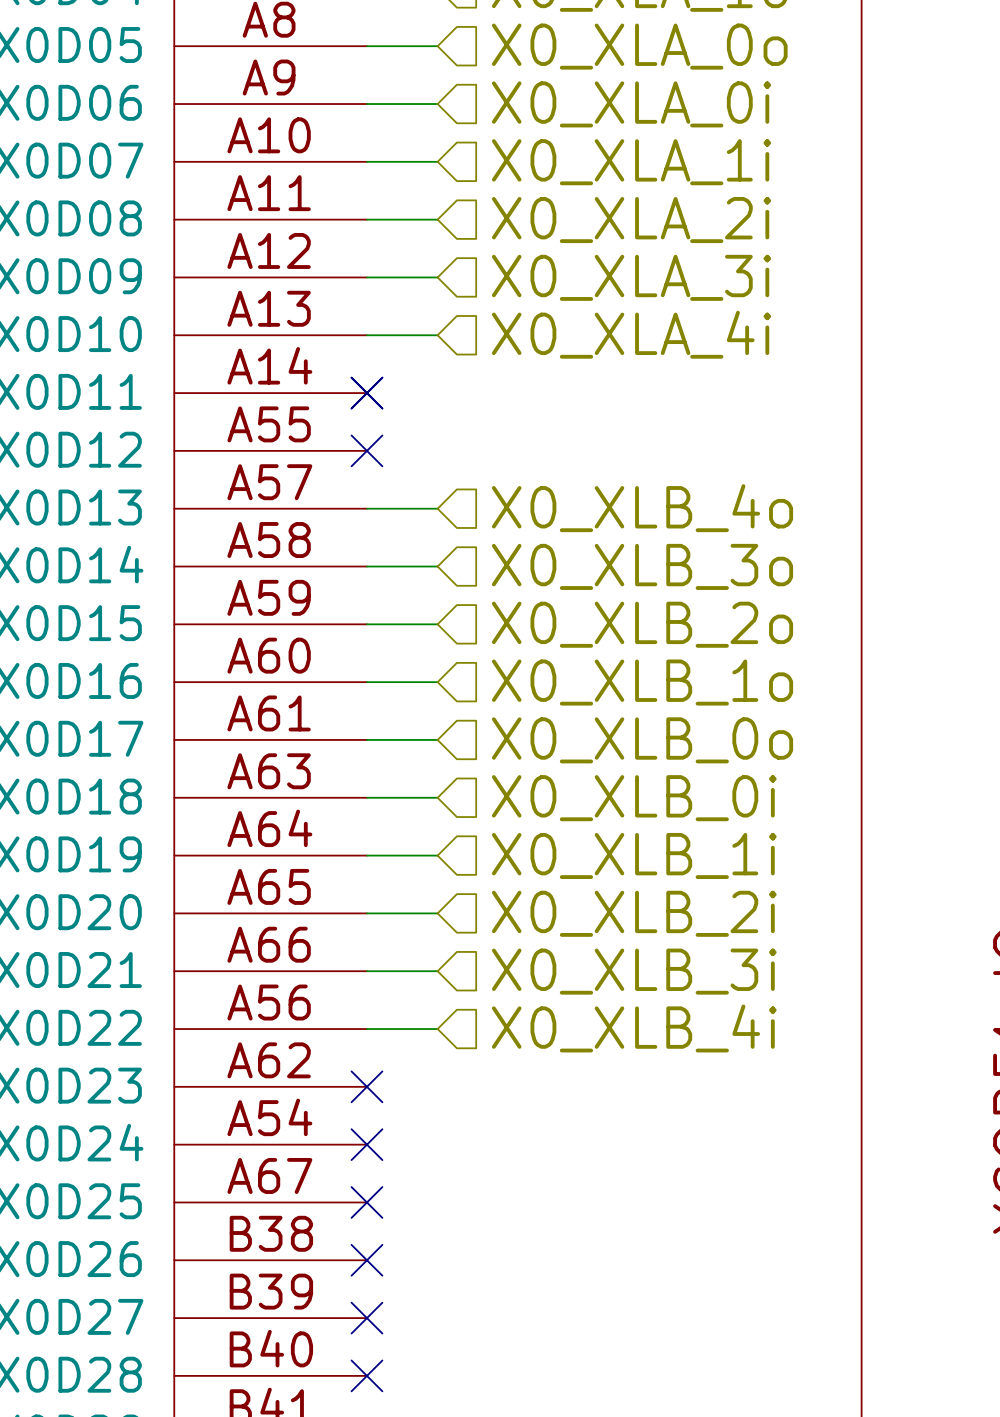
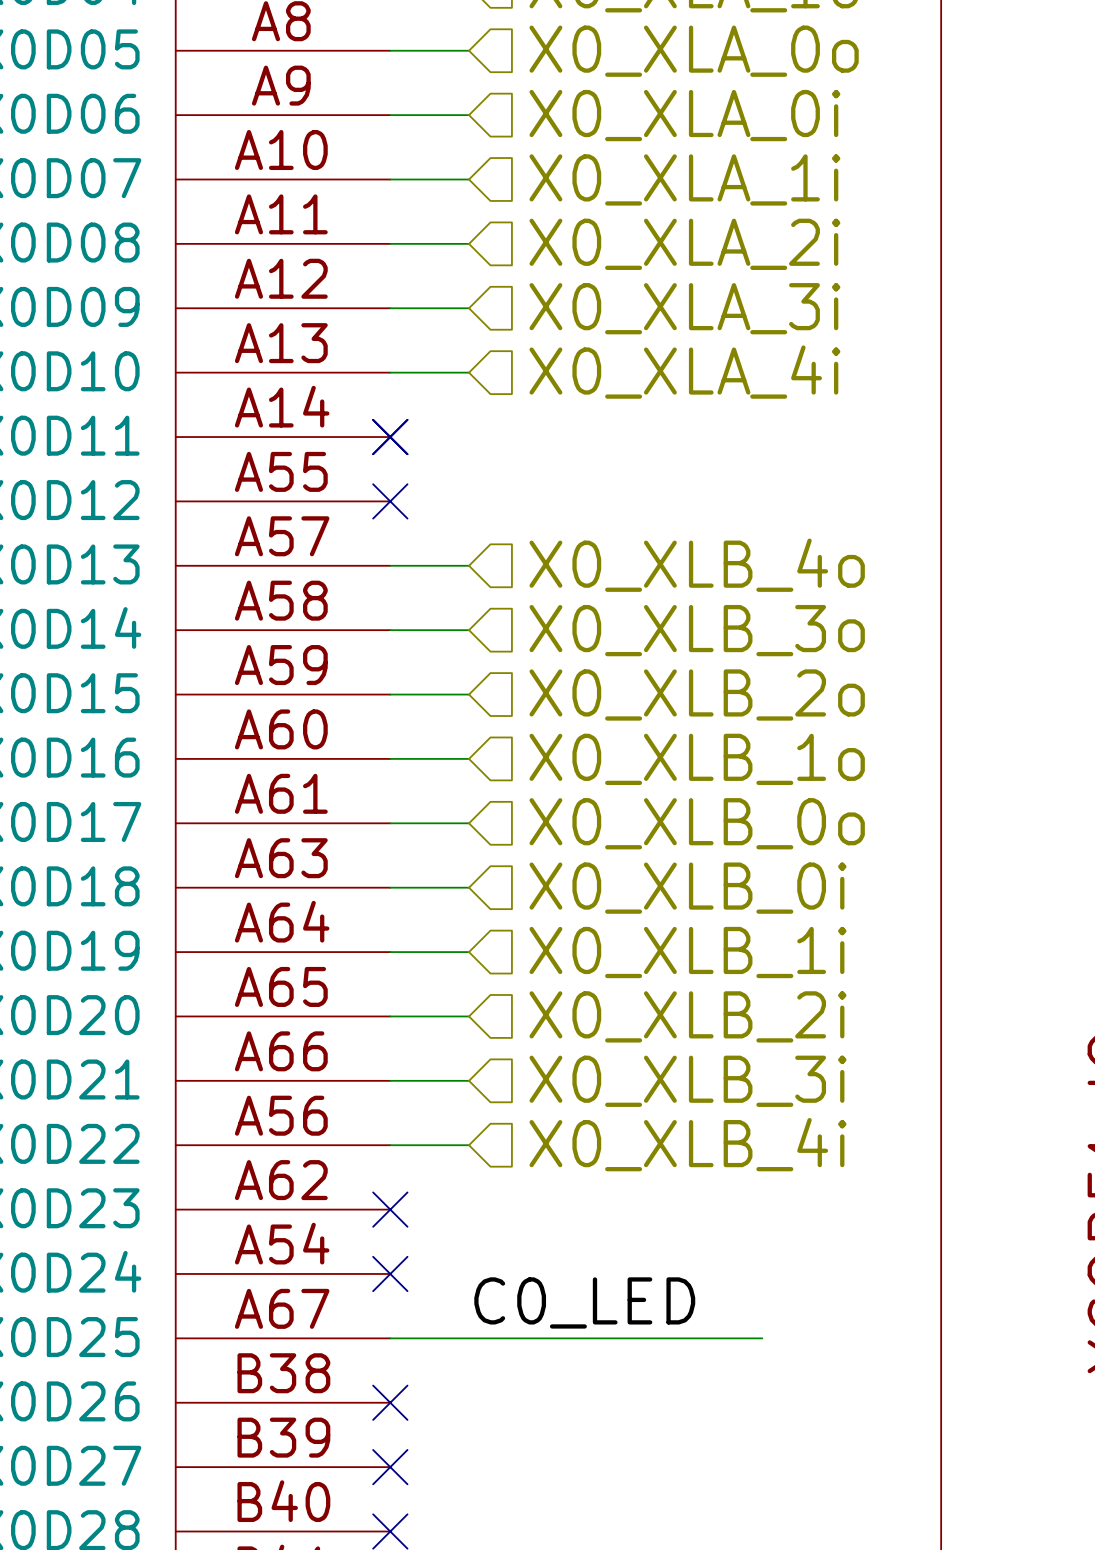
label: none -> C0_LED (584, 1302)
wire: none -> (390, 1338) (762, 1338)
no-connect mark: (366, 1202) -> none

